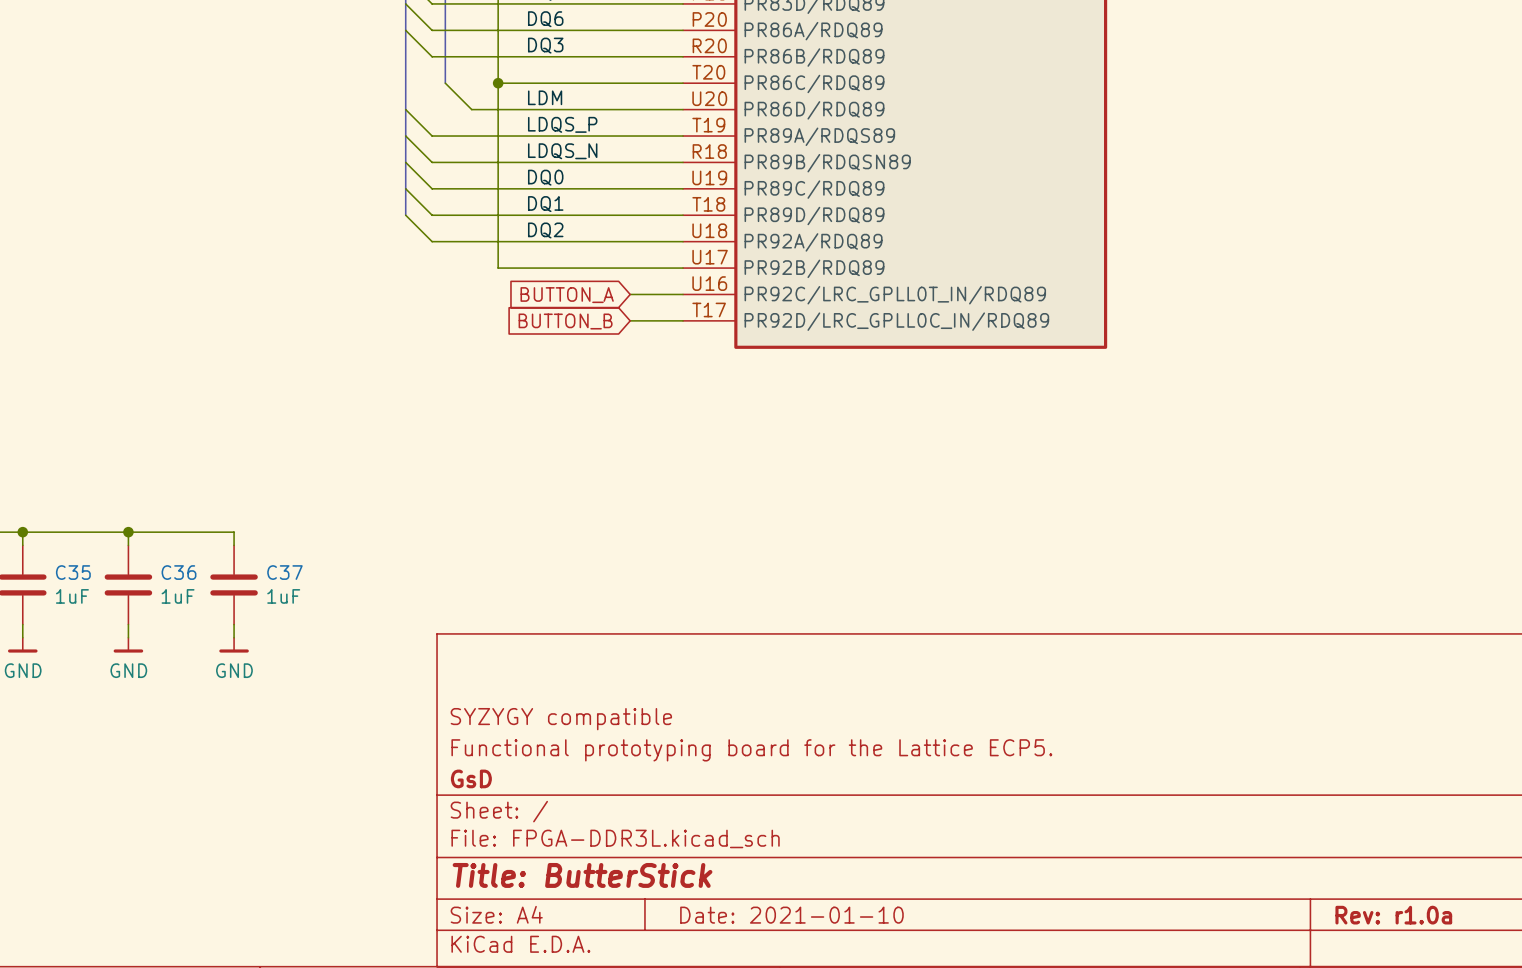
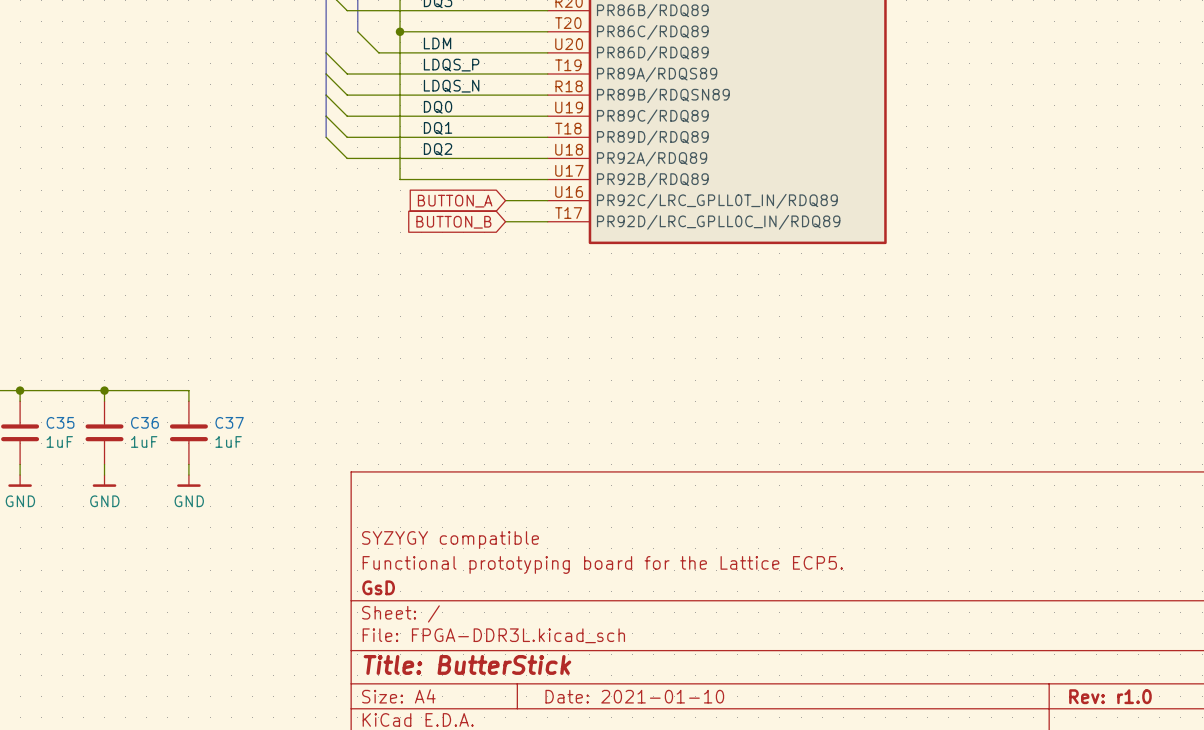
title block: Rev: r1.0a (1393, 915) -> Rev: r1.0 (1110, 696)

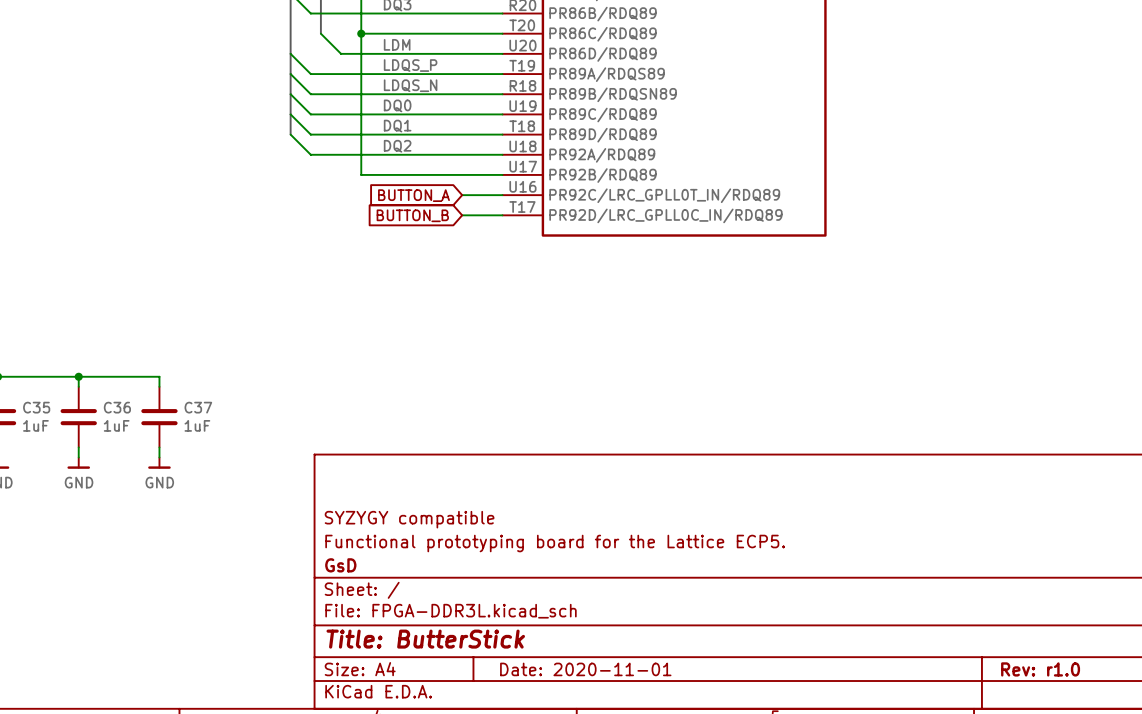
title block: Date: 2021-01-10 (634, 696) -> Date: 2020-11-01 (585, 669)

